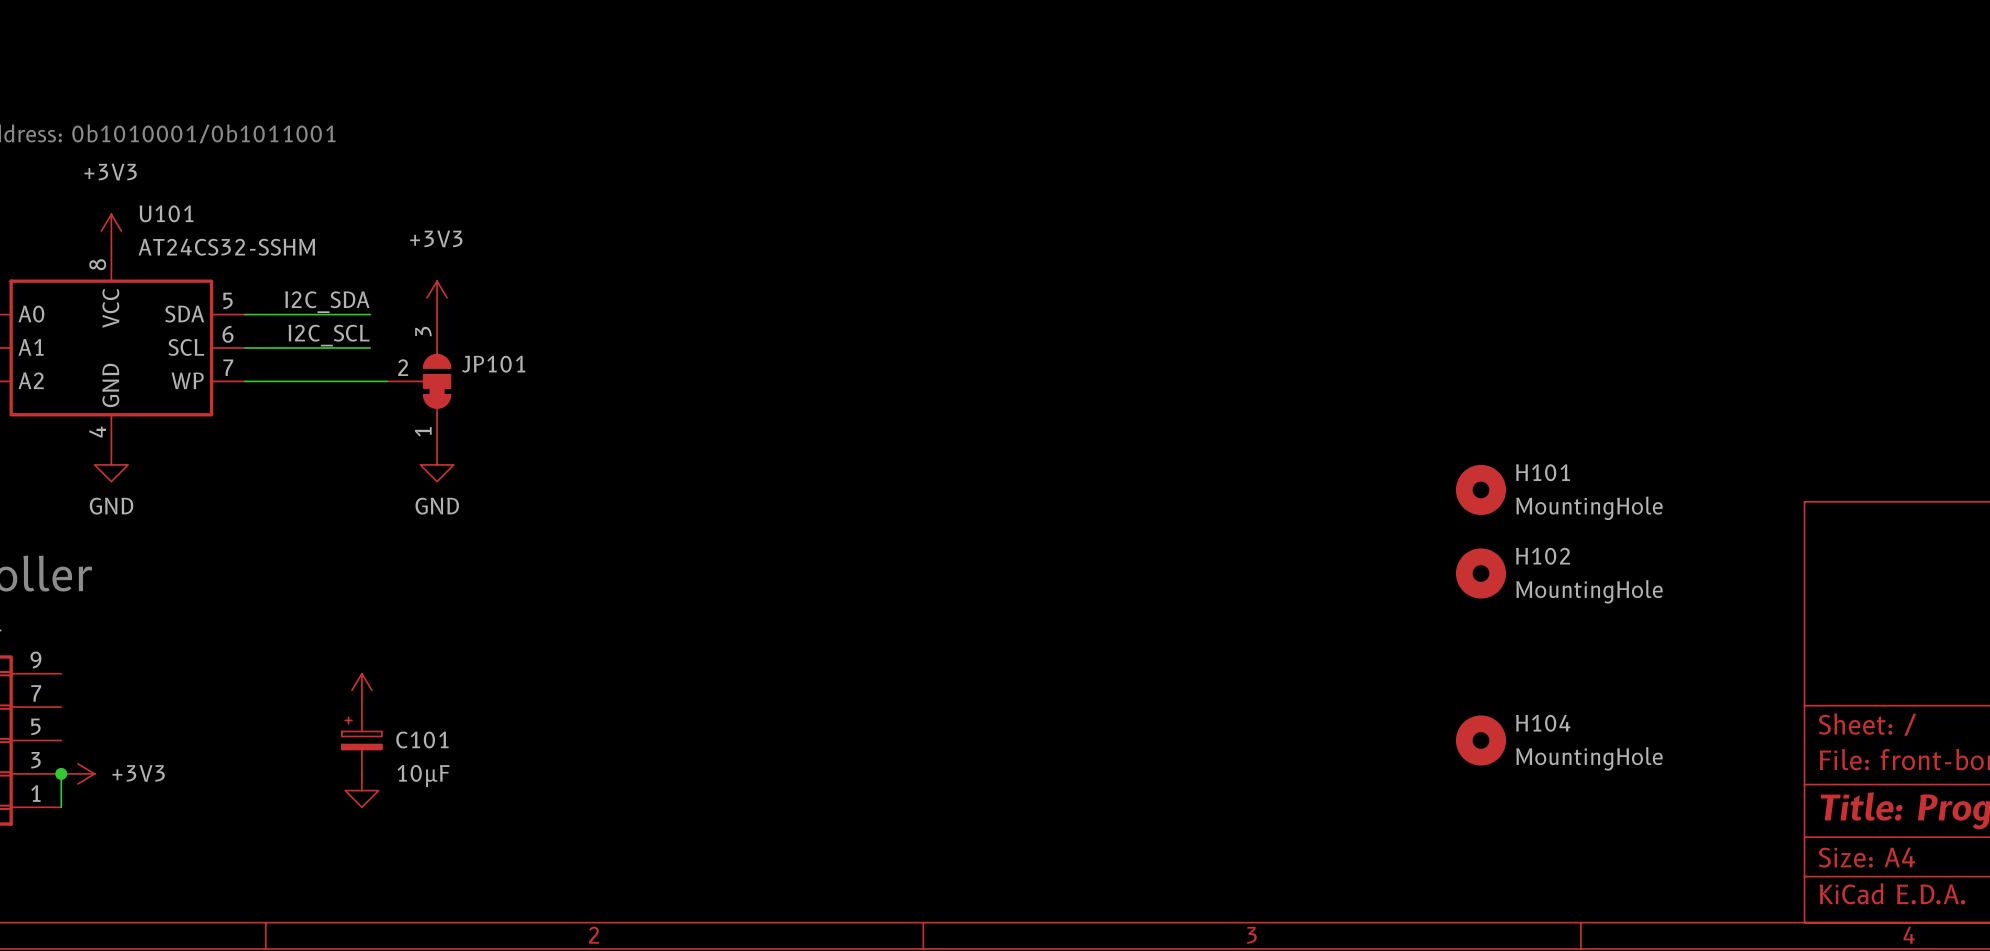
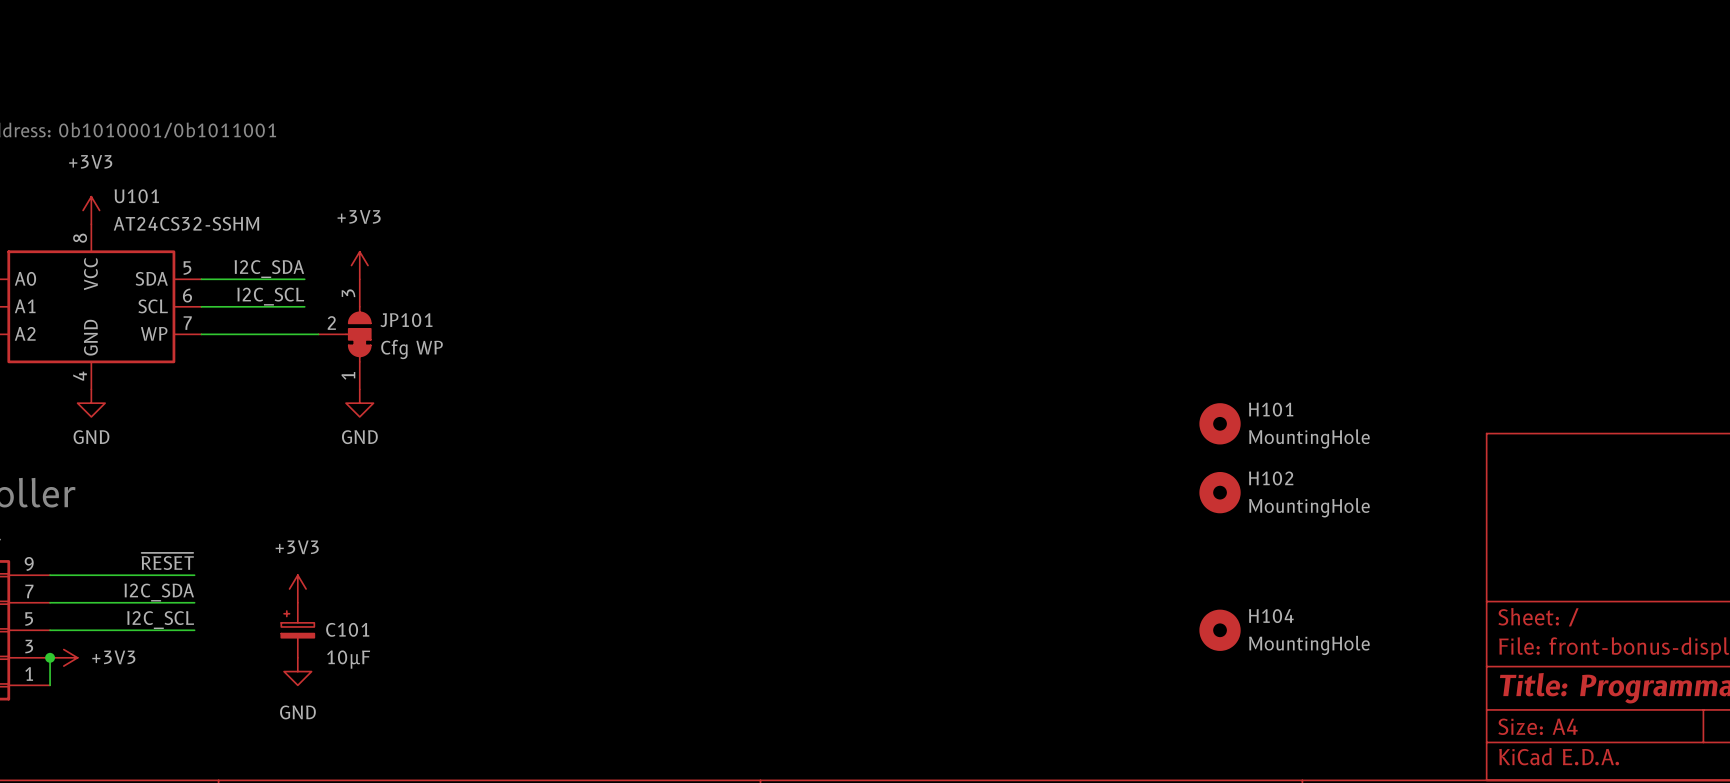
JP101 value: none -> Cfg WP (412, 349)
power symbol text: none -> +3V3 (297, 547)
label: none -> ~{RESET} (167, 561)
wire: none -> (50, 575) (194, 575)
label: none -> I2C_SDA (159, 592)
wire: none -> (50, 602) (194, 602)
label: none -> I2C_SCL (160, 620)
wire: none -> (50, 630) (194, 630)
power symbol text: none -> GND (297, 712)

